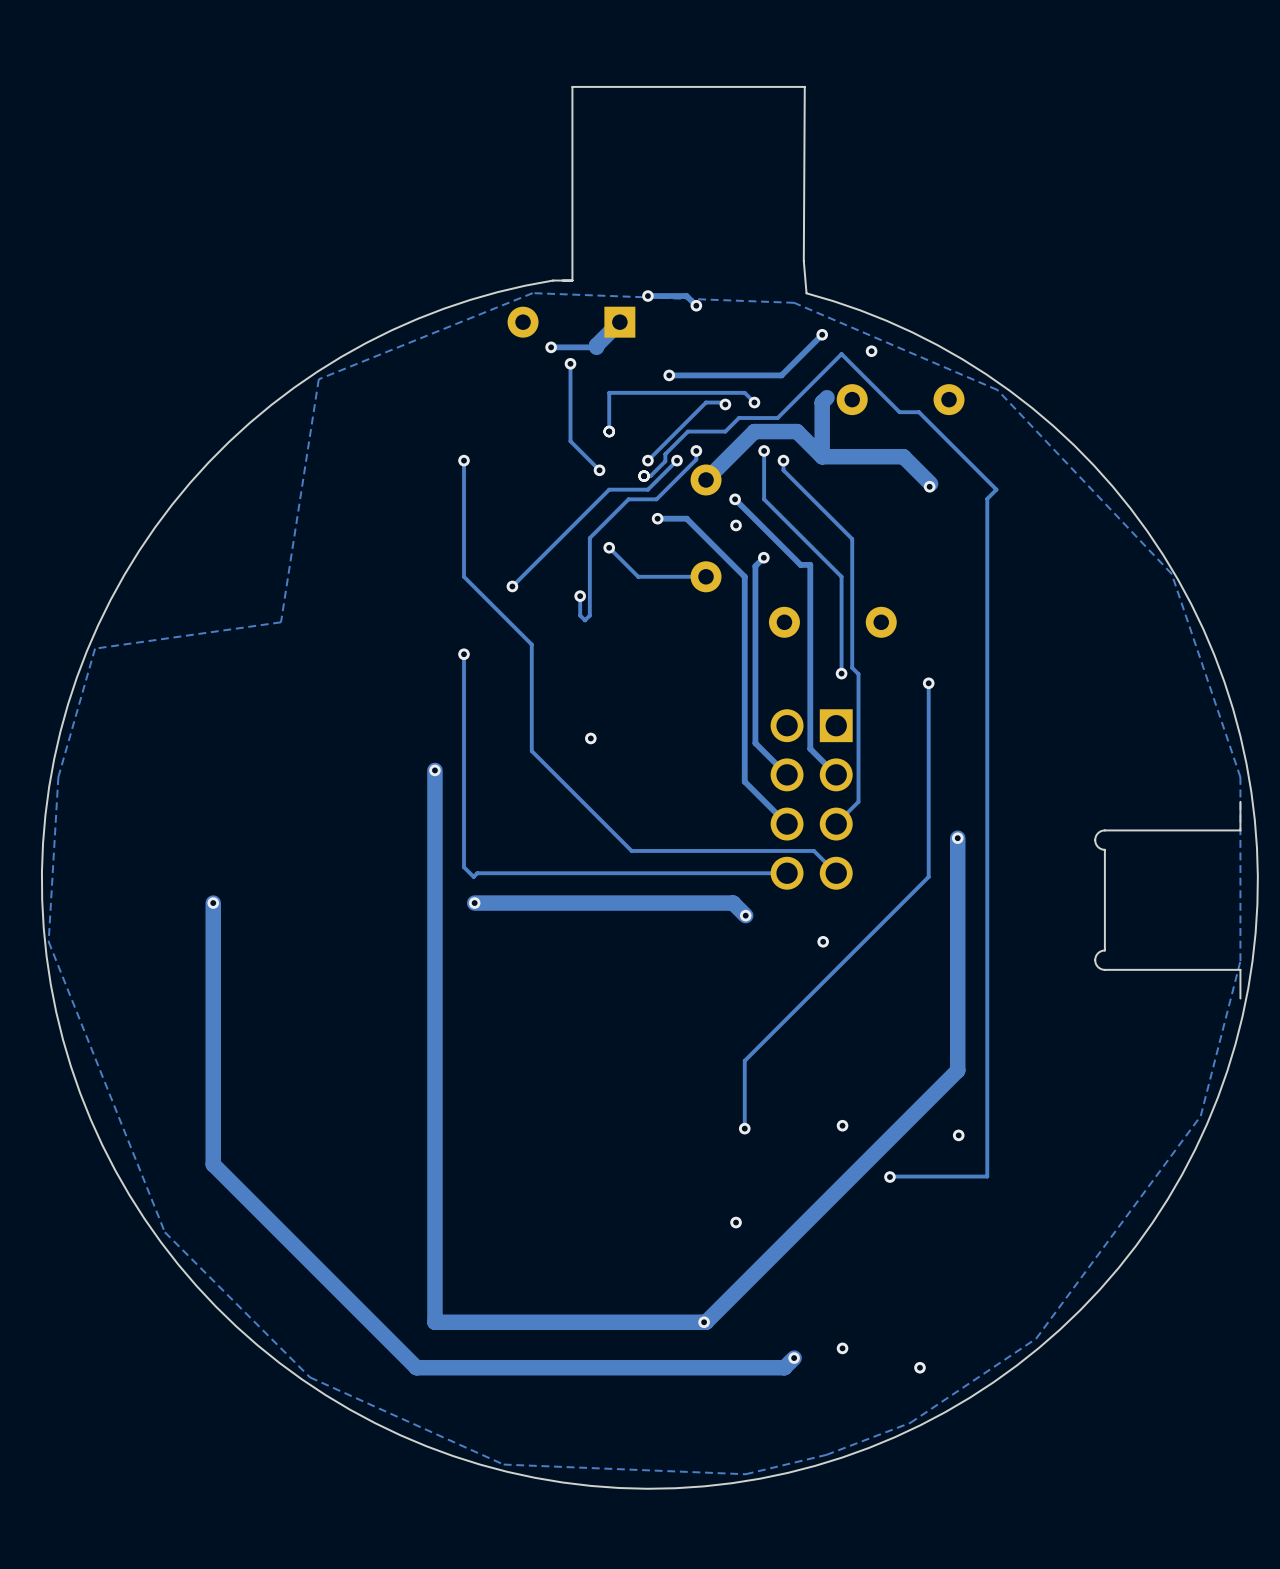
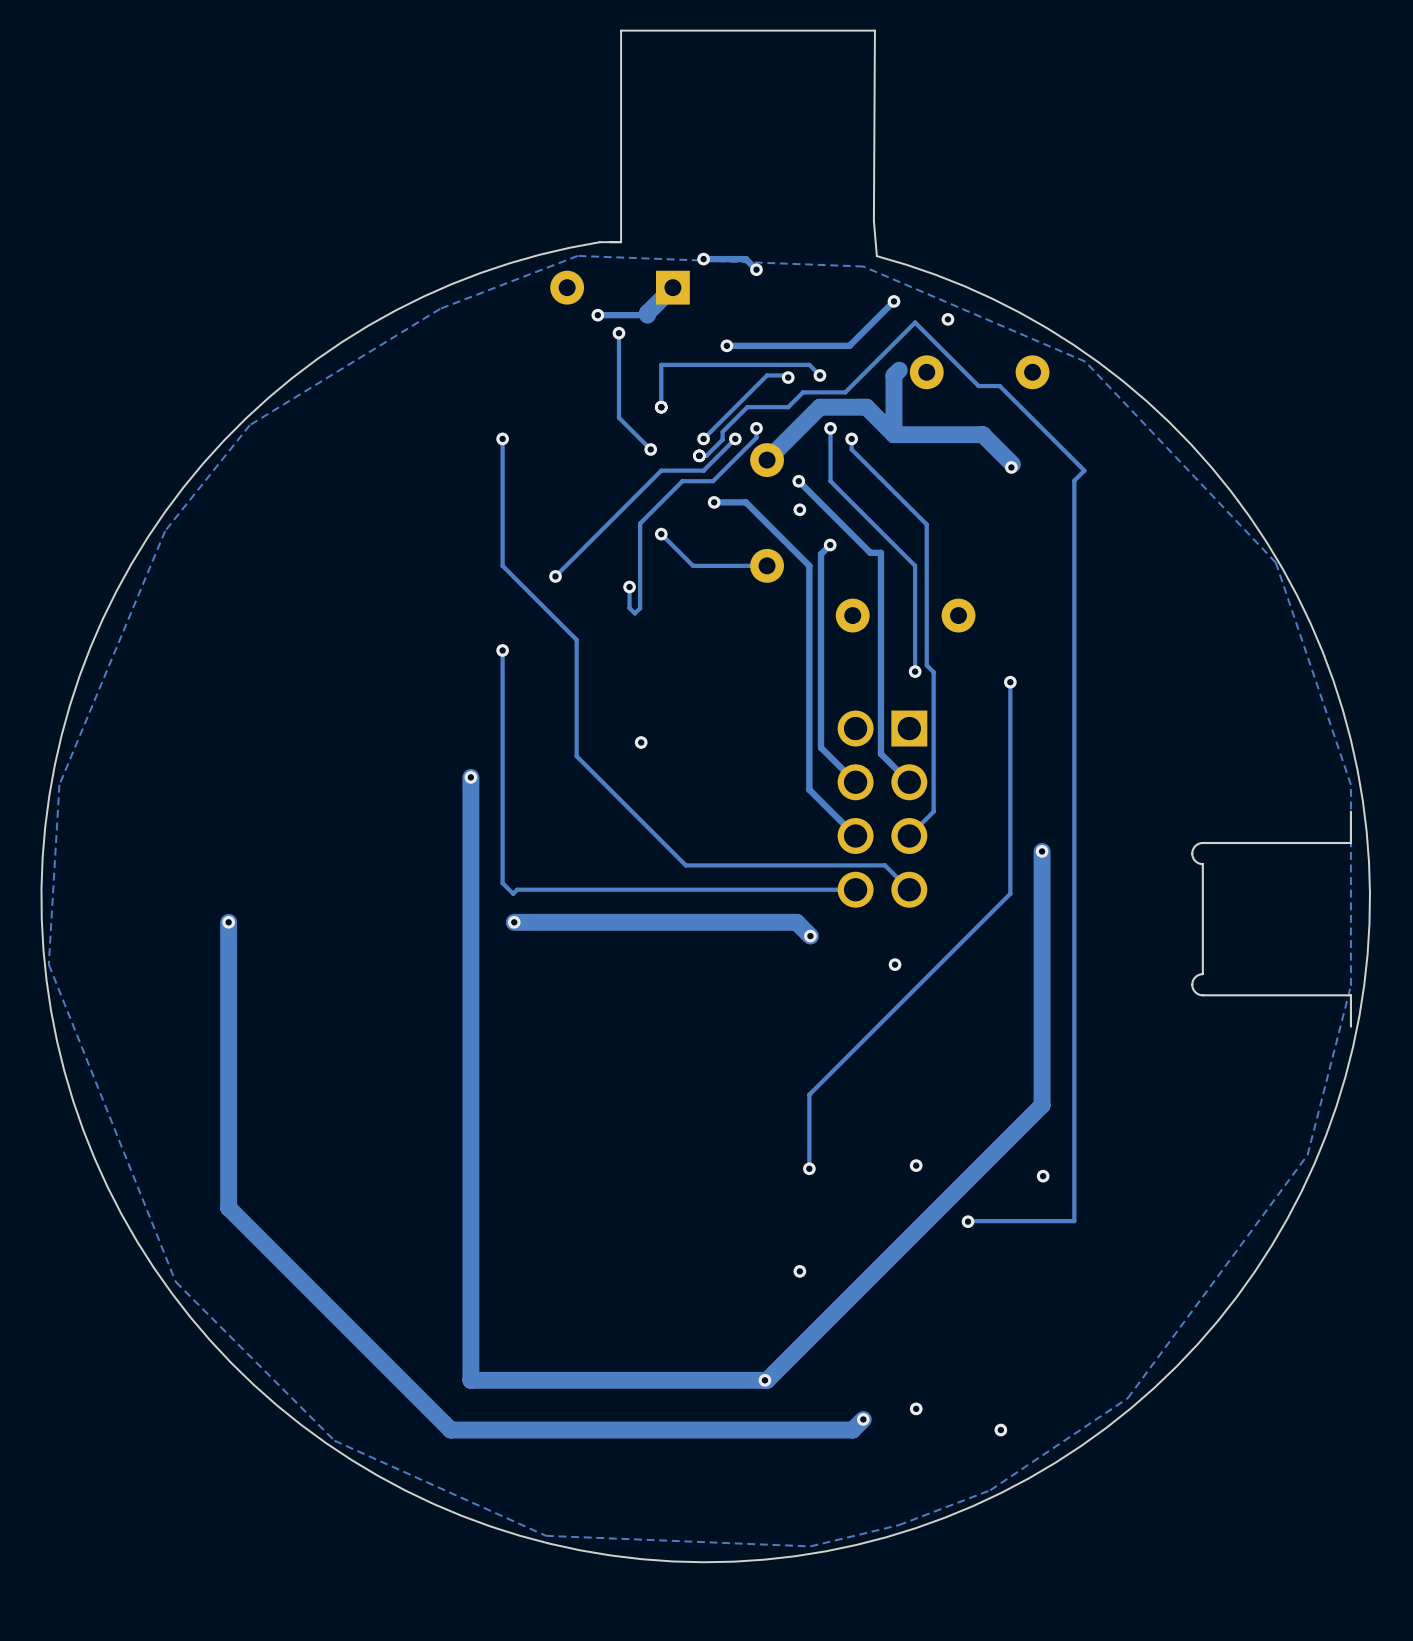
zone outline: (532, 293) (318, 379) (281, 622) (95, 648) (58, 777) -> (577, 255) (440, 308) (249, 425) (165, 530) (59, 784)

